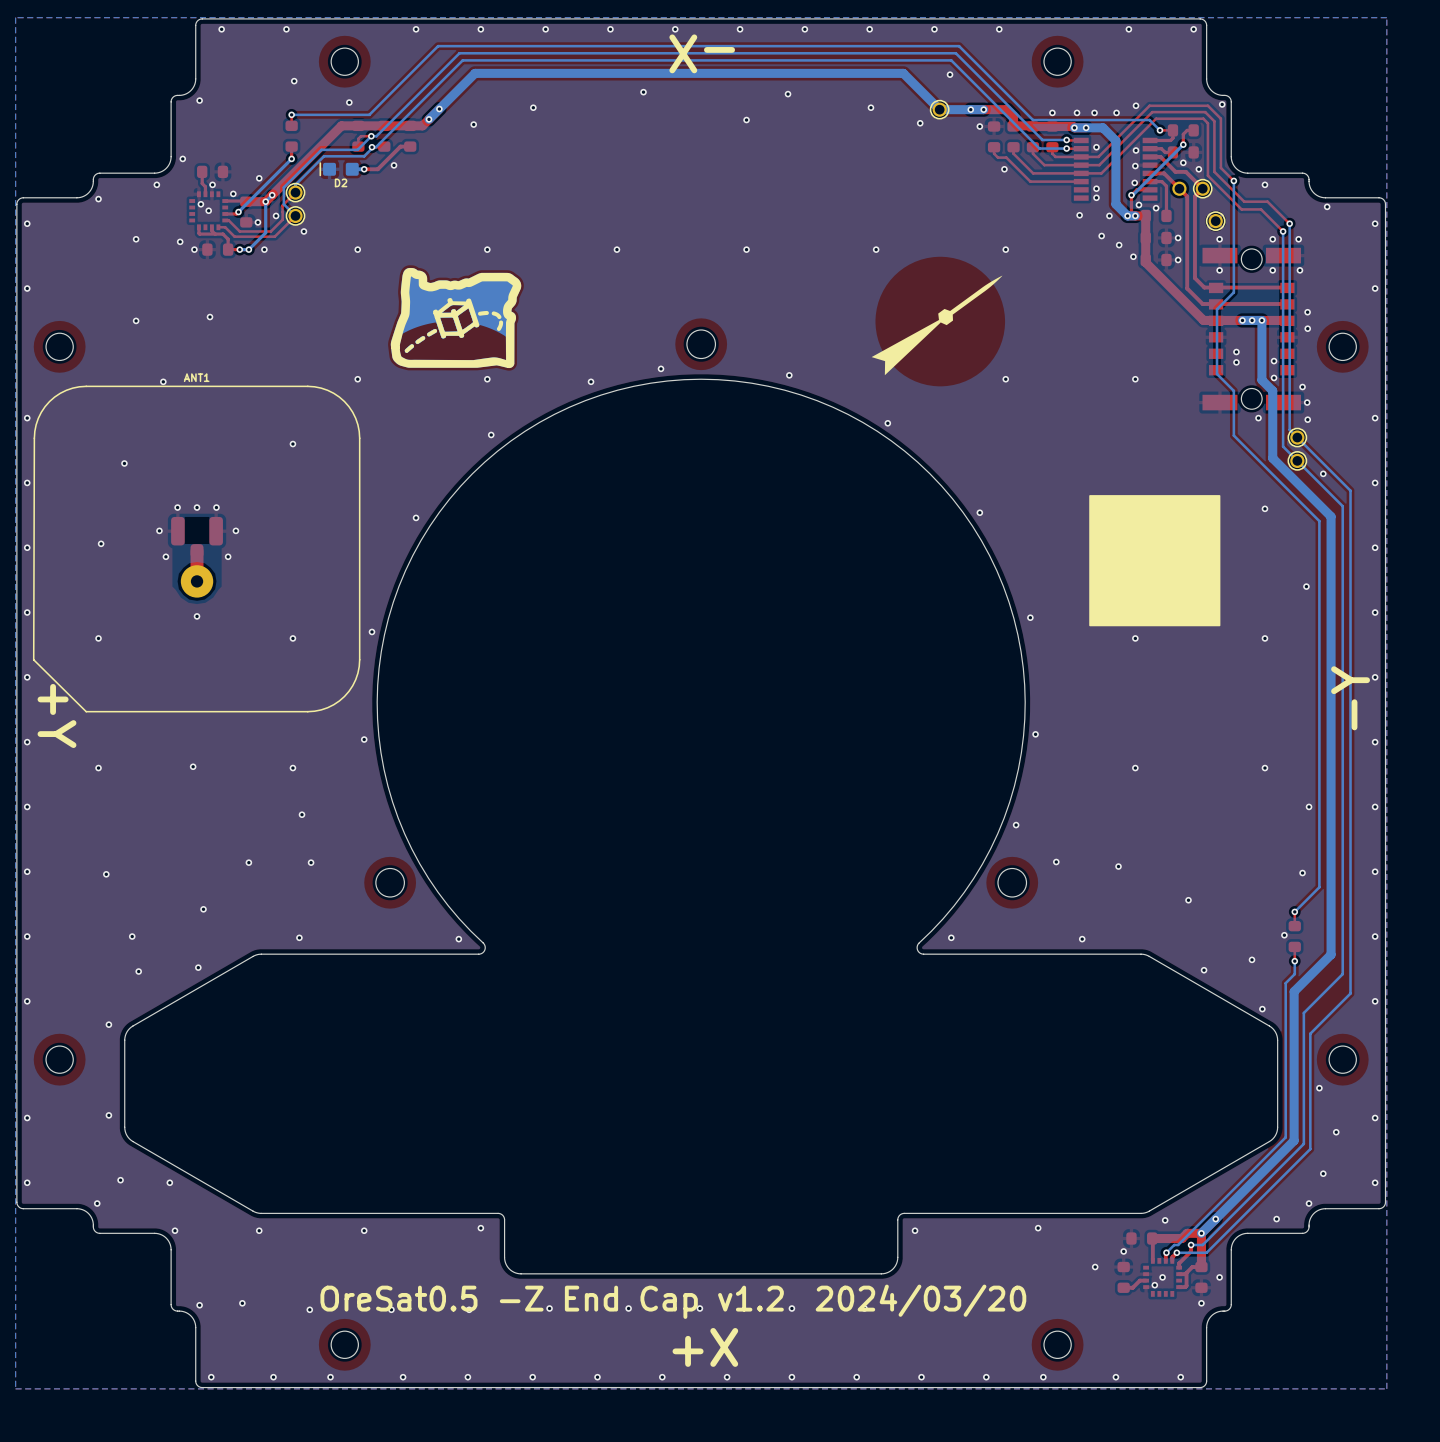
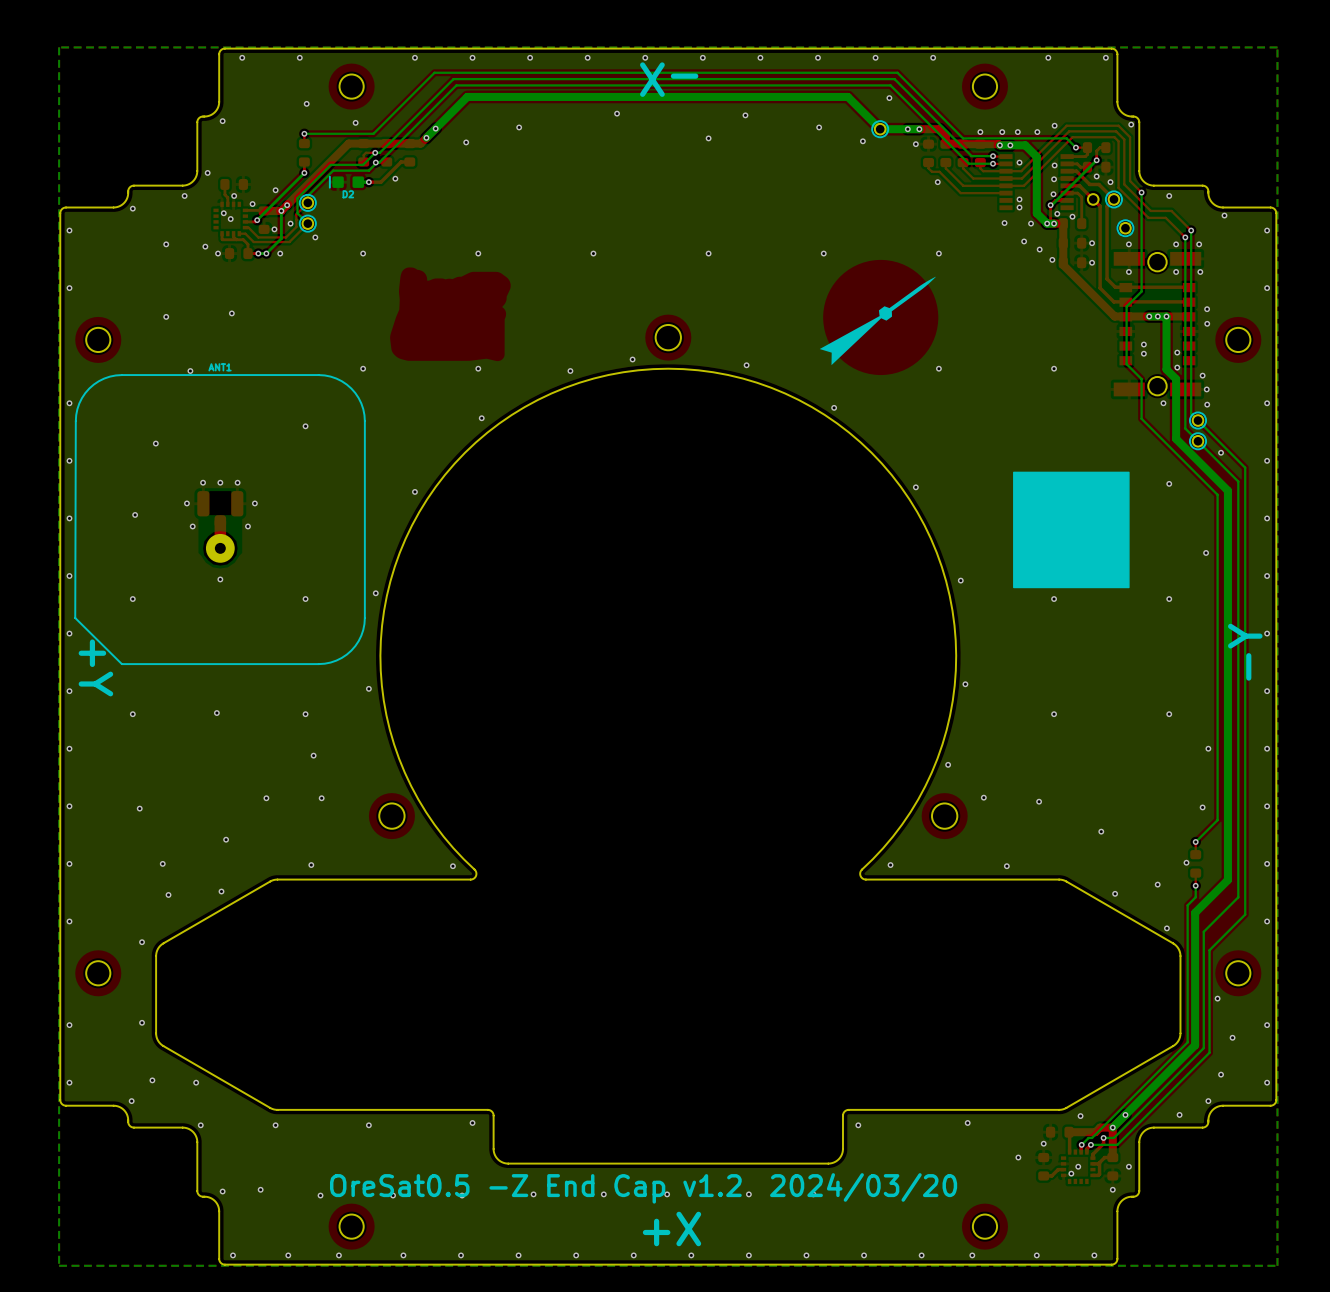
drawing: [390, 267, 522, 369] -> none

